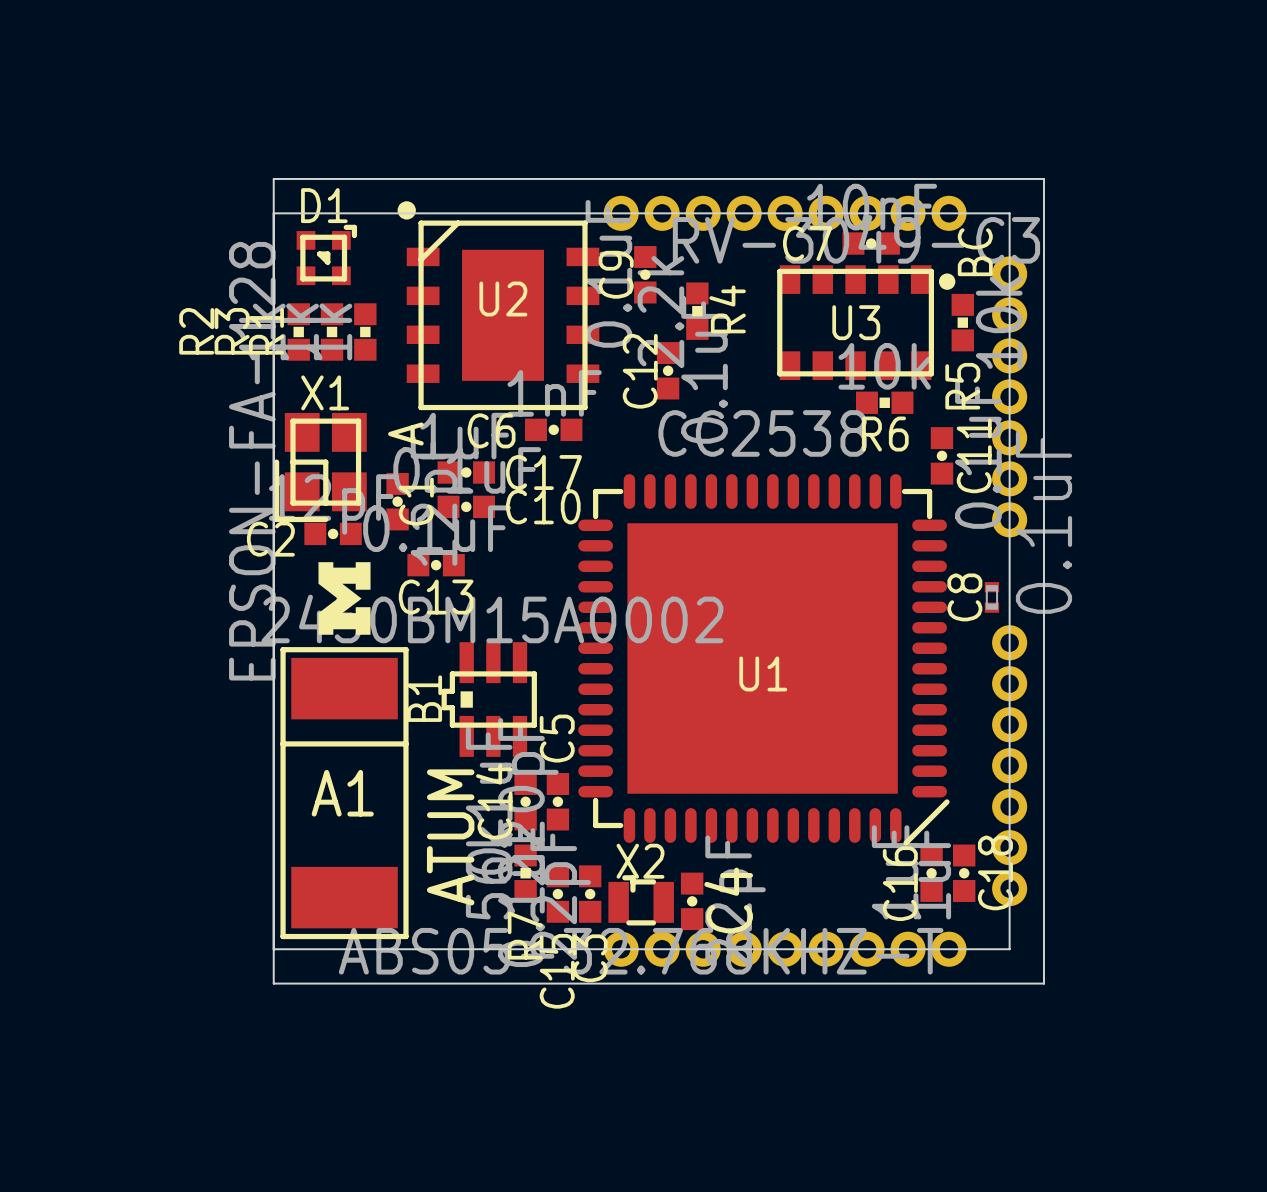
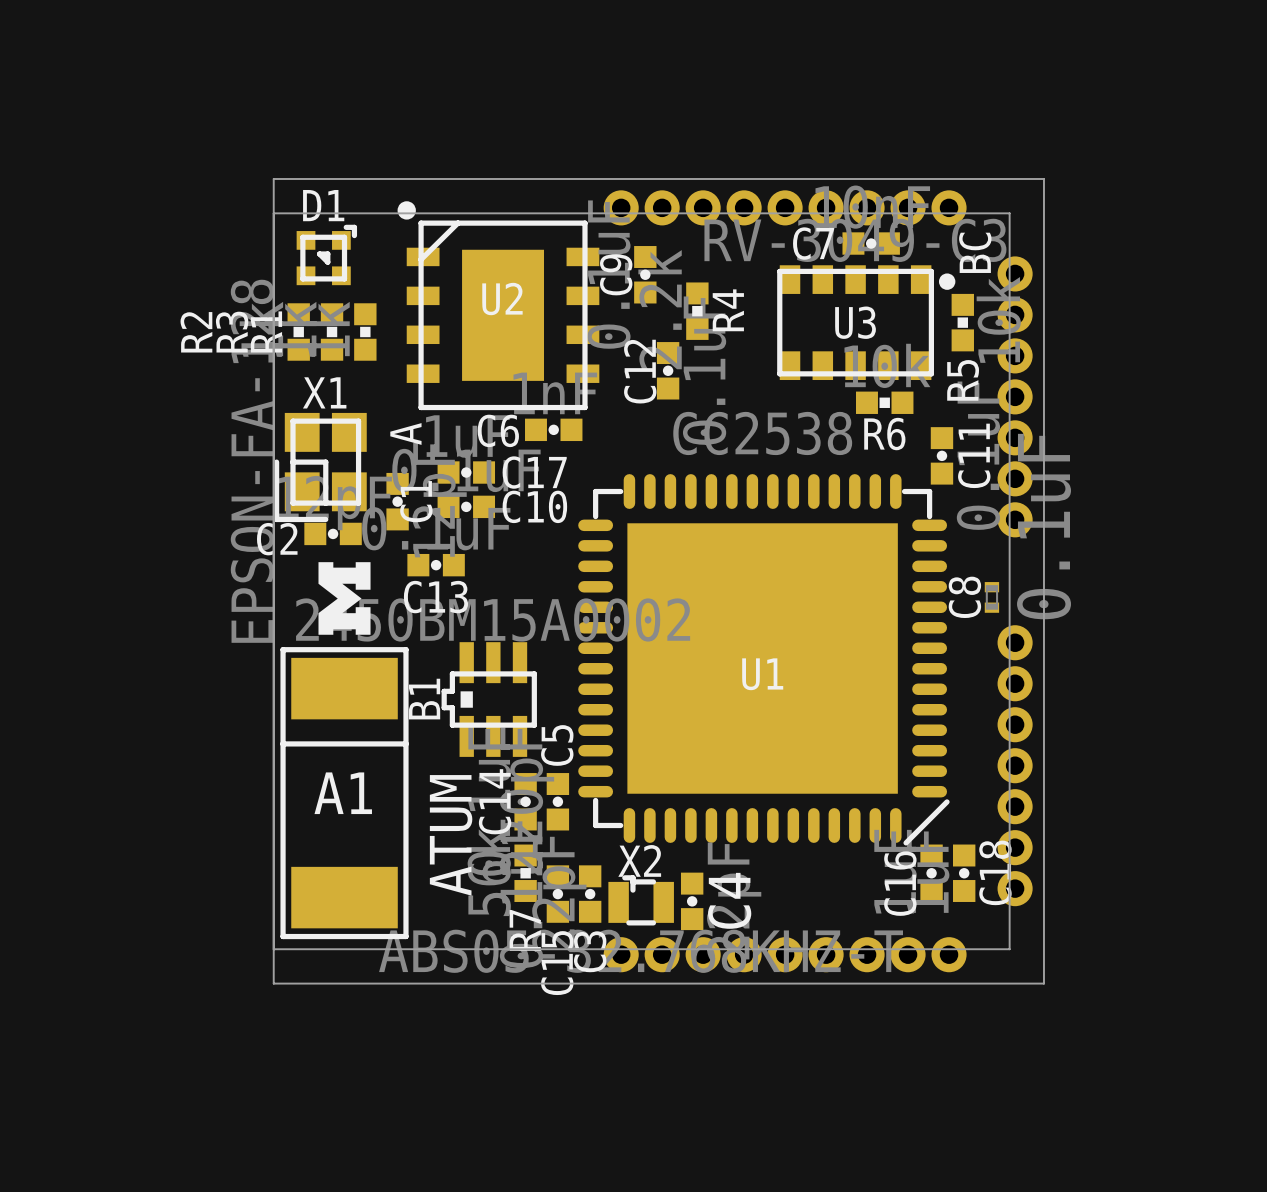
part footprint: [603, 195, 1028, 967] -> [603, 190, 1033, 973]

